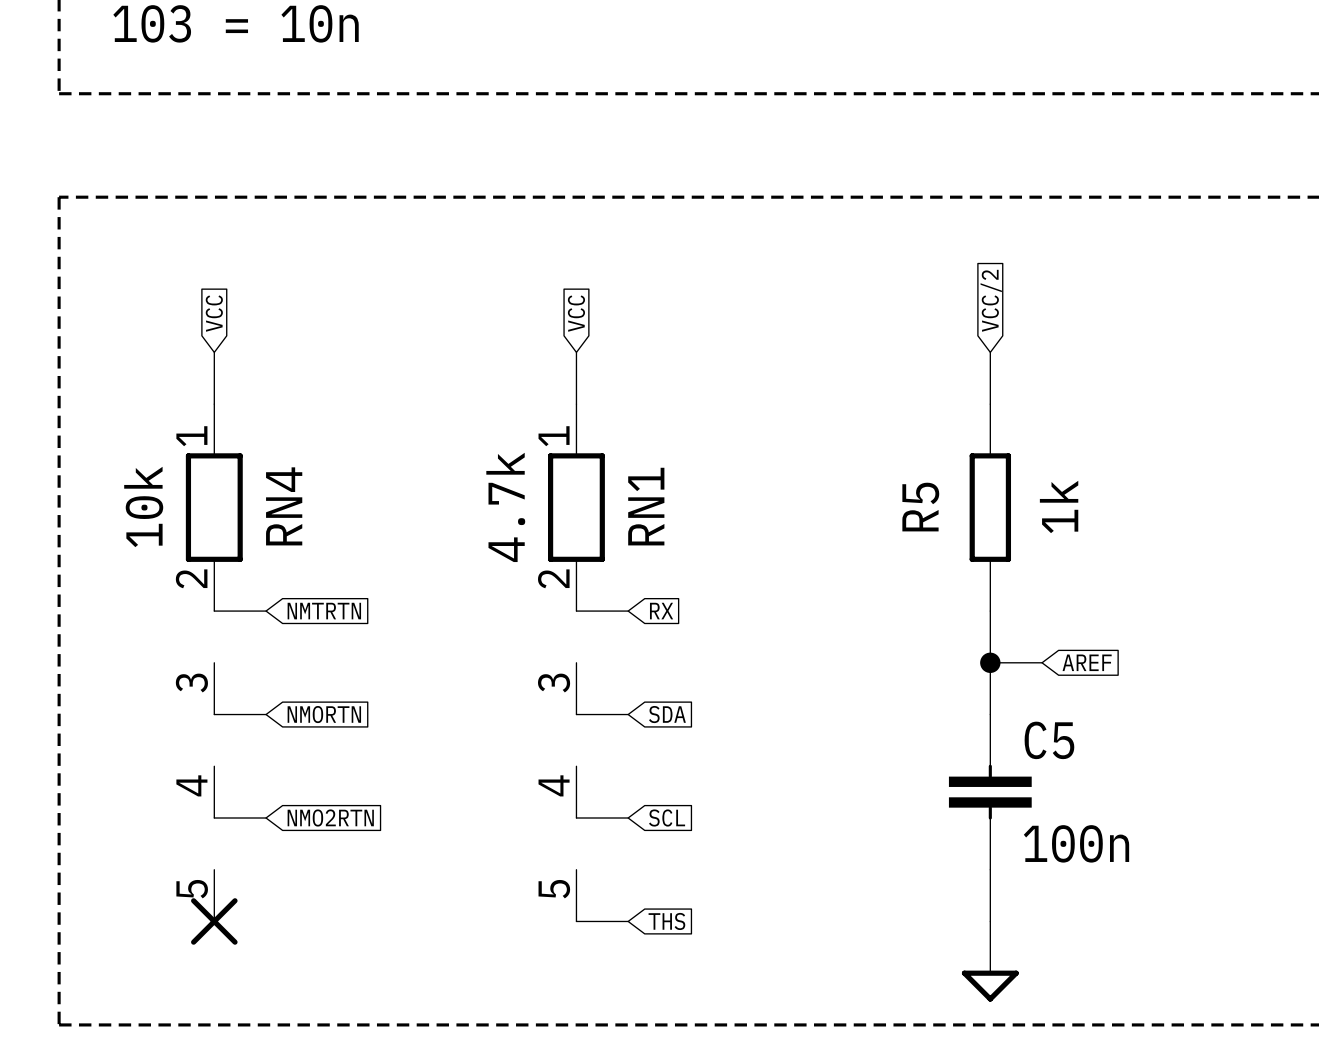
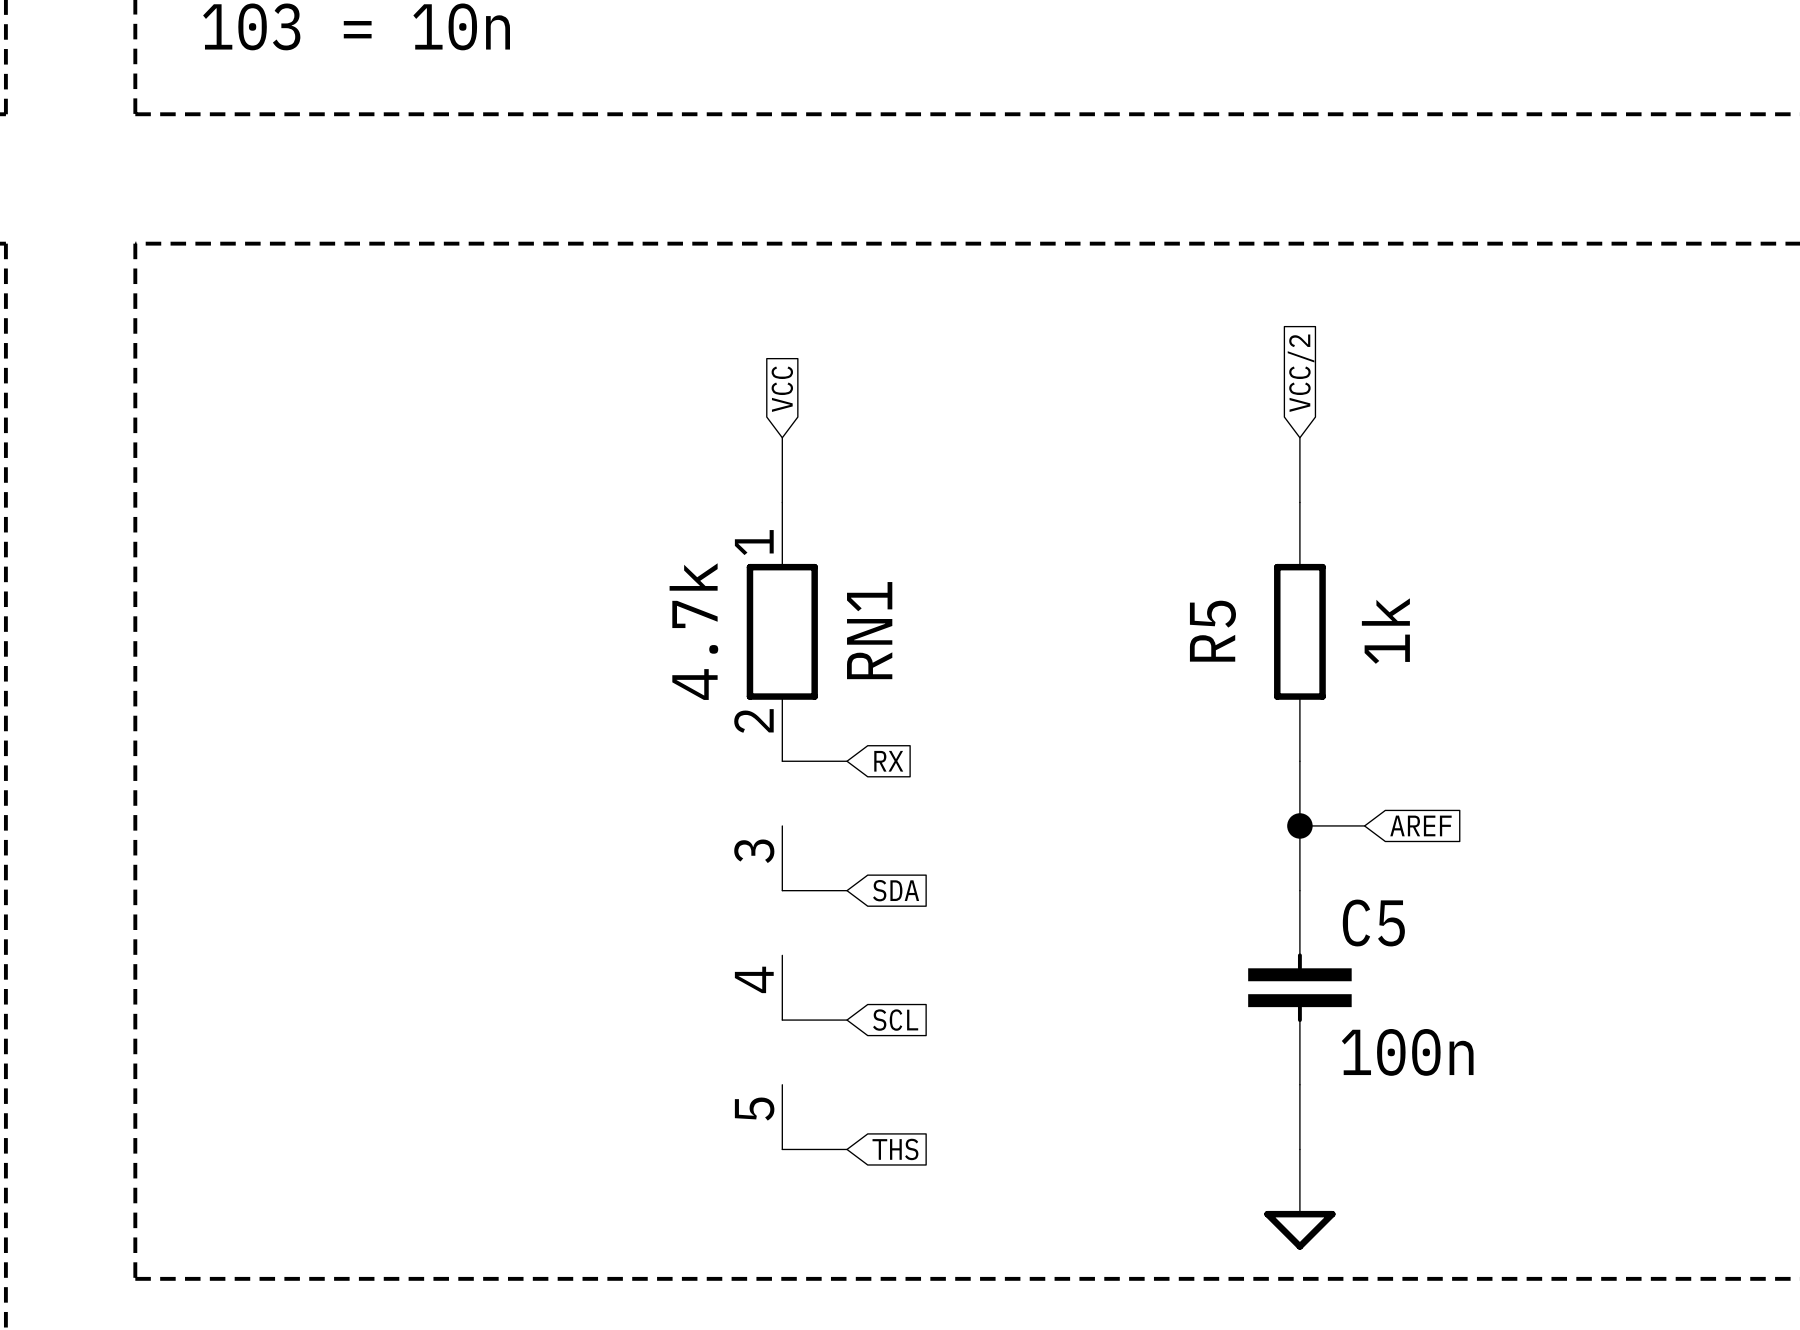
global label: VCC (214, 313) -> none
wire: (214, 352) (214, 404) -> none
wire: (214, 611) (266, 611) -> none
global label: NMTRTN (324, 611) -> none
RN4: 10k (214, 662) -> none
wire: (214, 714) (266, 714) -> none
global label: NMORTN (324, 714) -> none
wire: (214, 818) (266, 818) -> none
global label: NMO2RTN (330, 818) -> none
part: (214, 921) -> none

